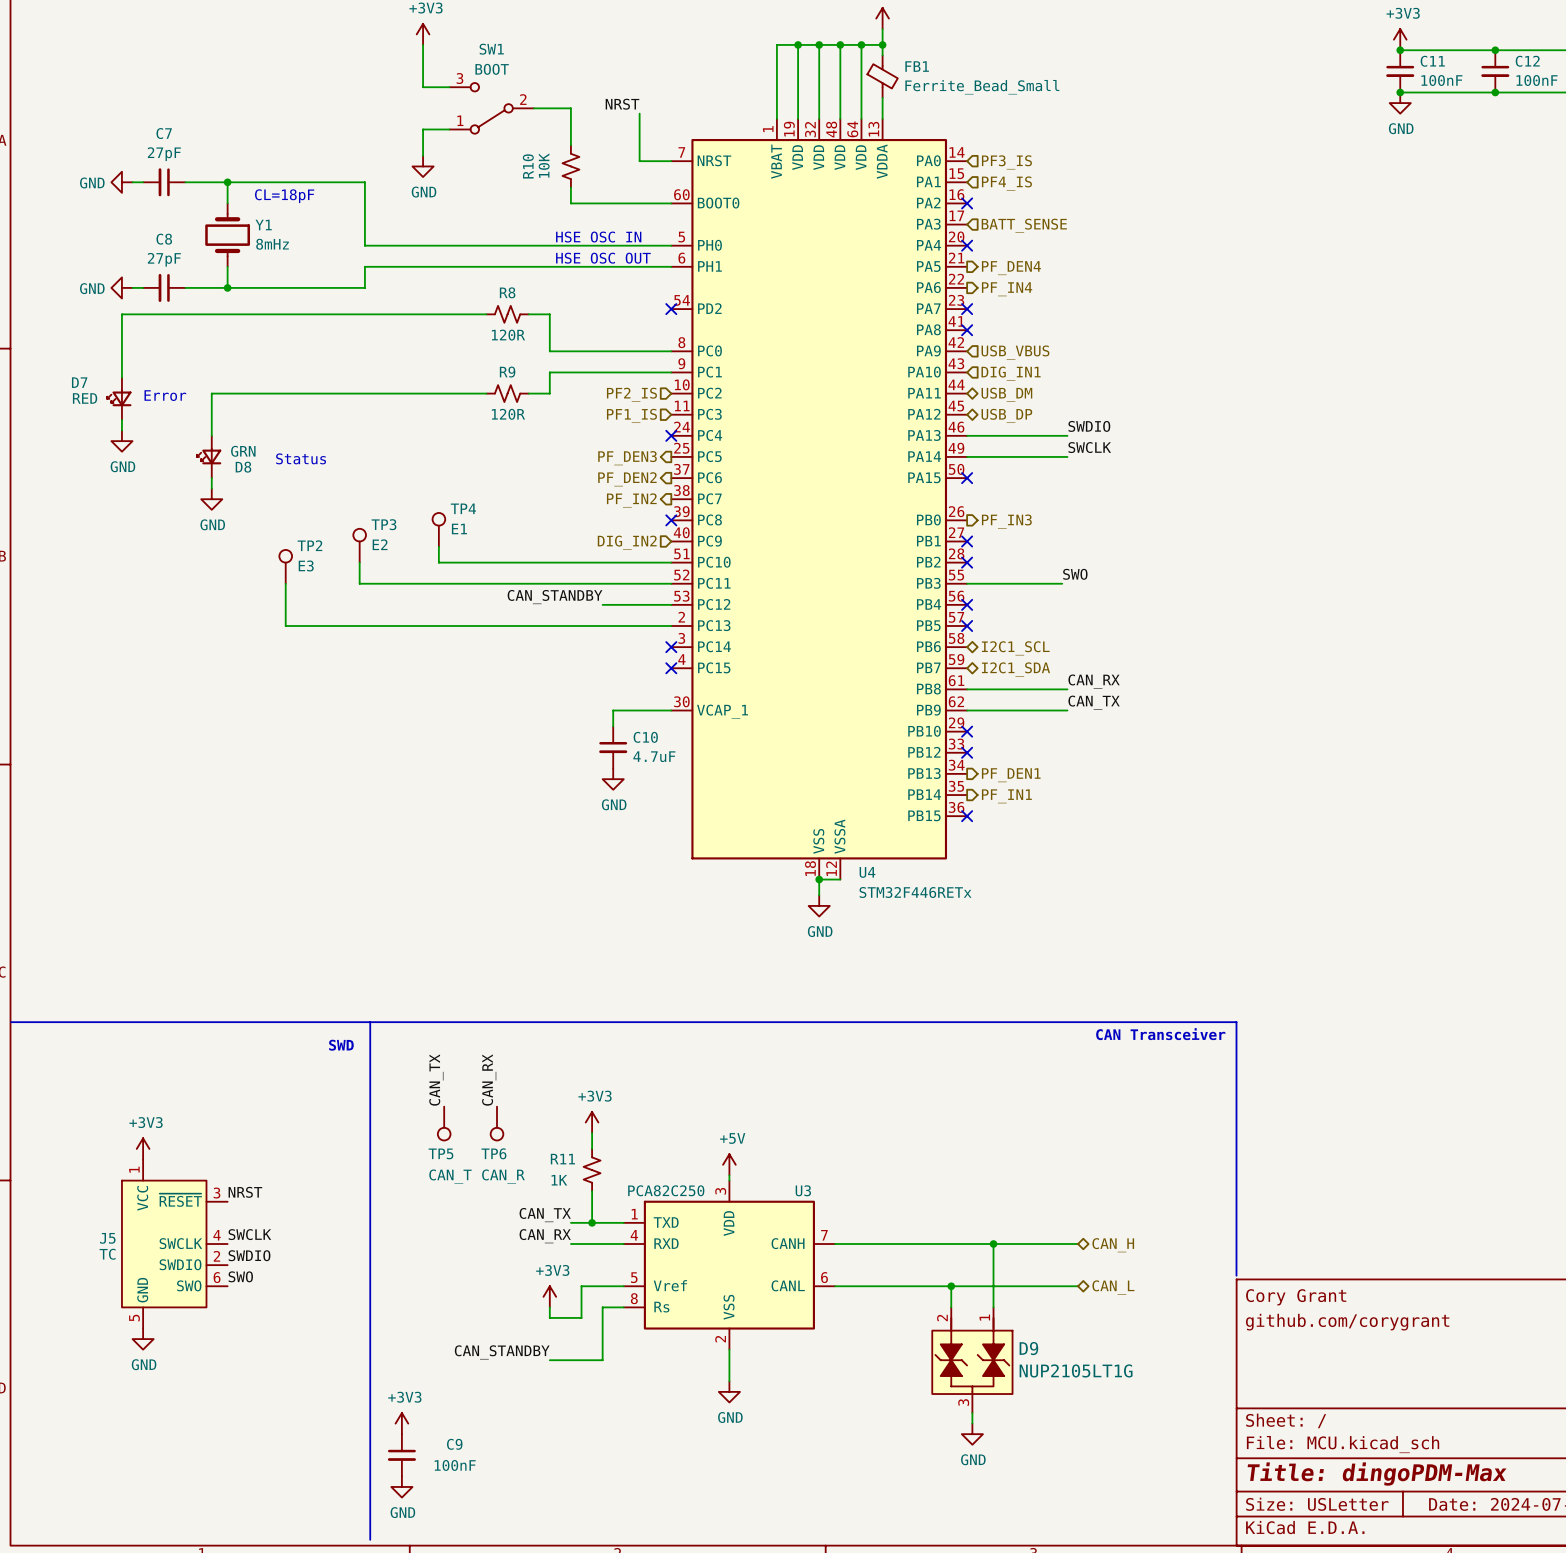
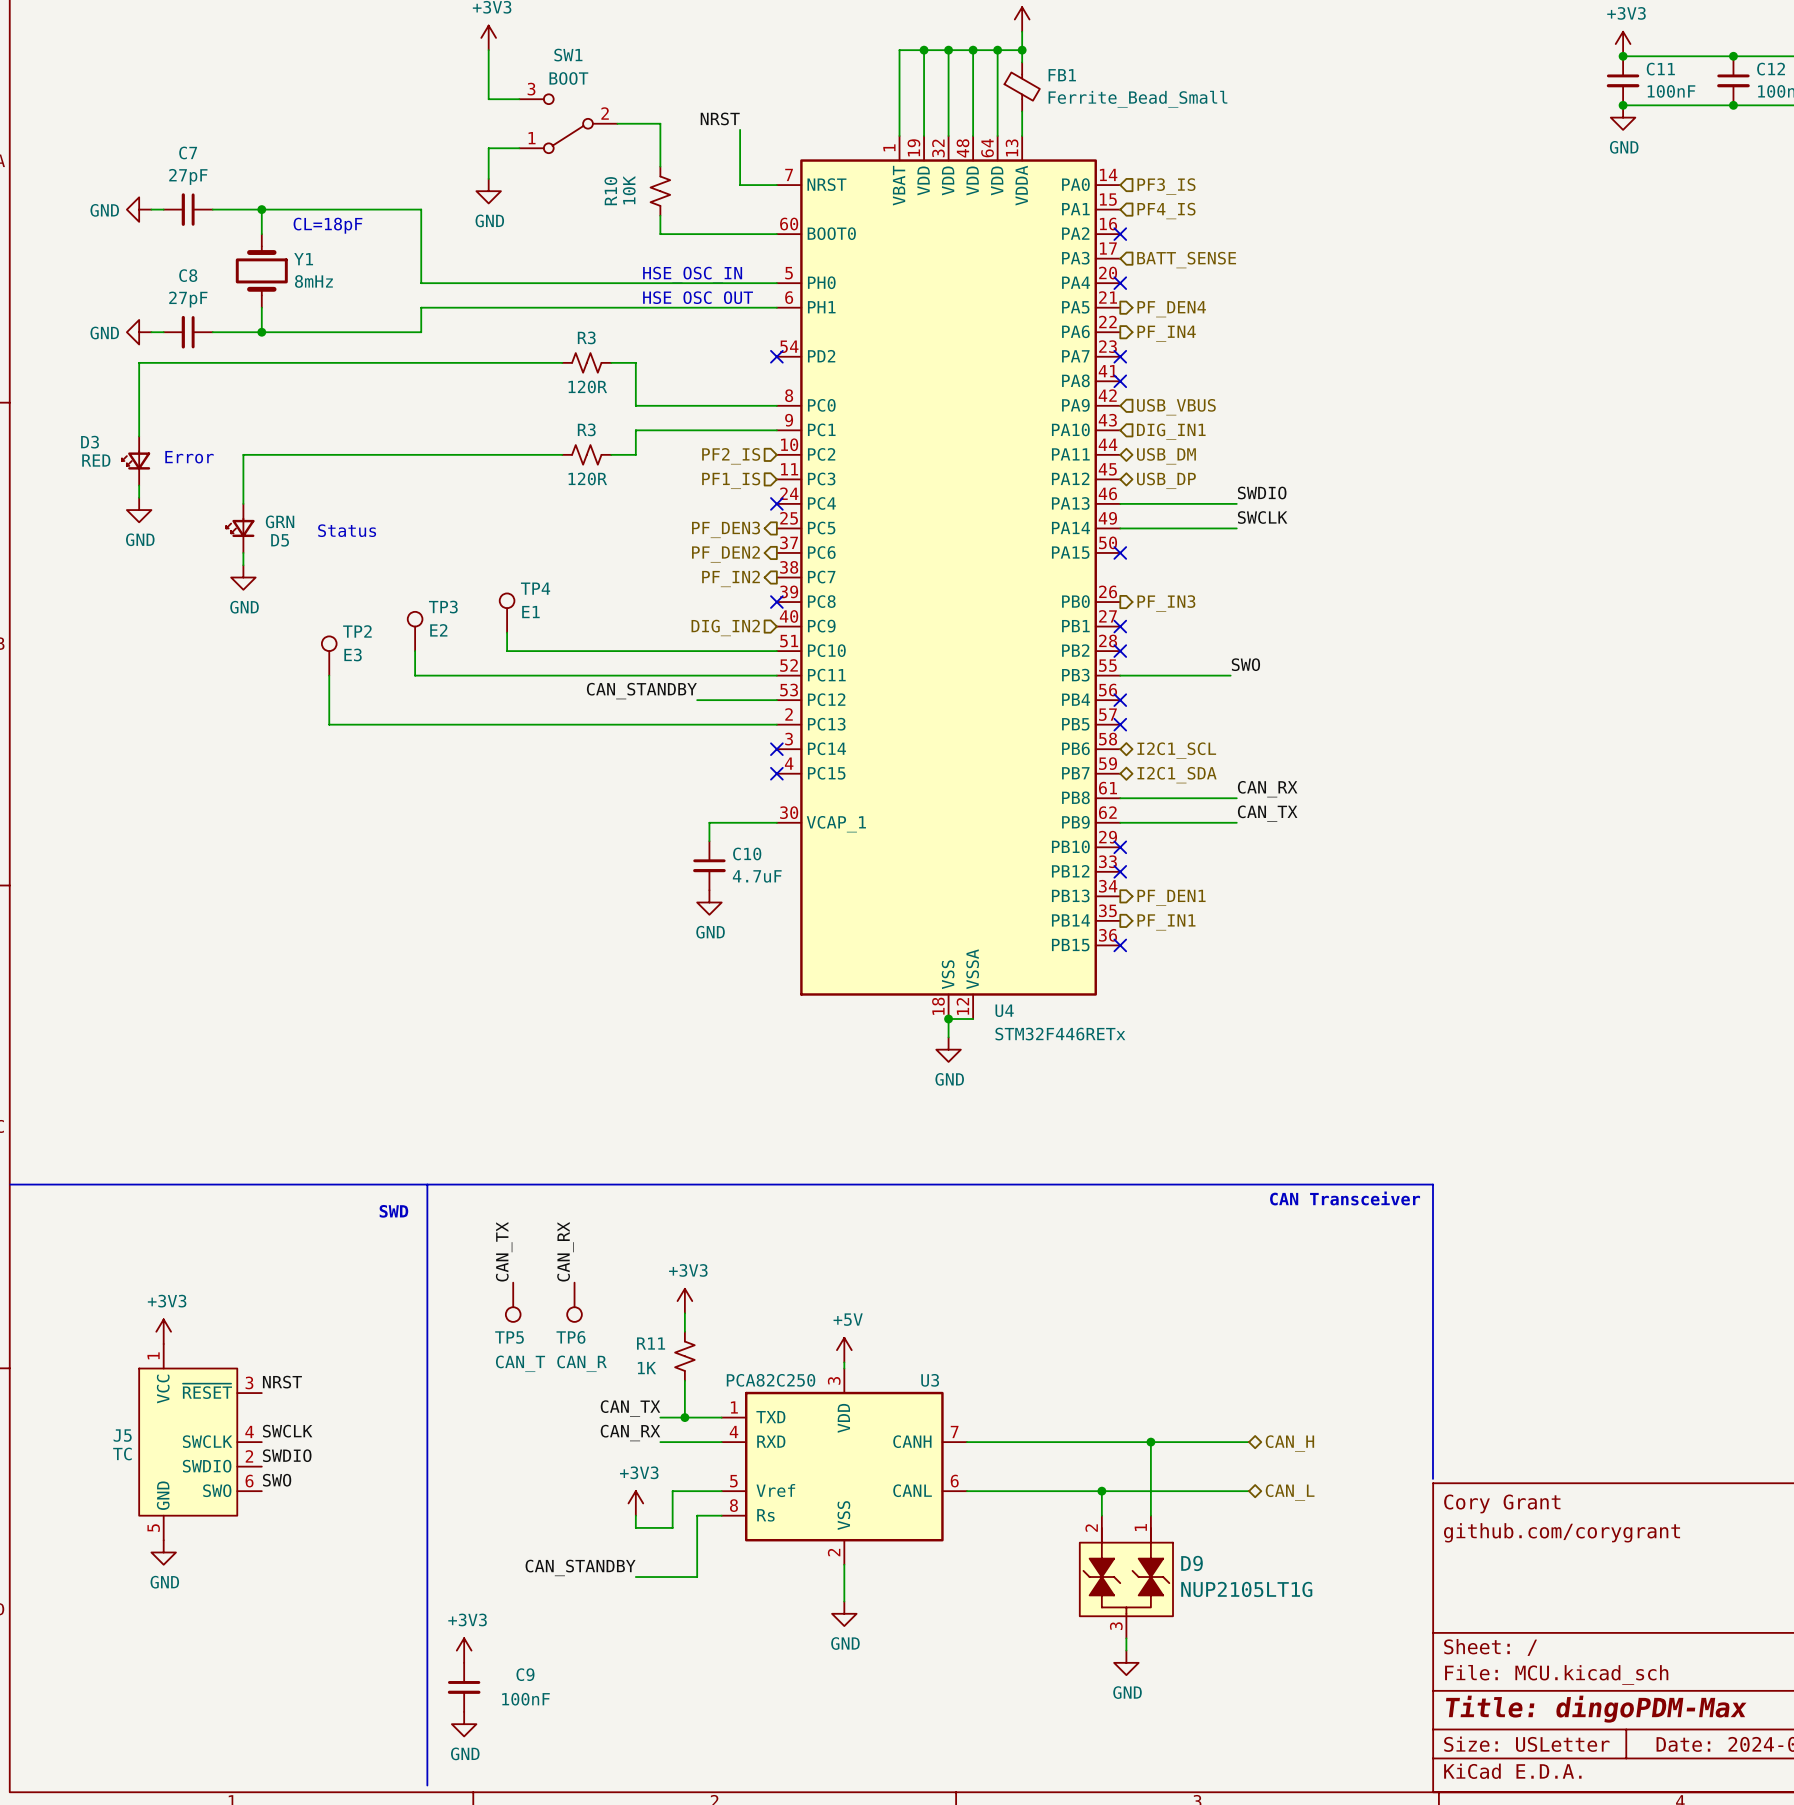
R8 name: R8 (507, 292) -> R3 (586, 337)
R9 name: R9 (507, 372) -> R3 (586, 429)
D7 name: D7 (79, 382) -> D3 (90, 442)
D8 name: D8 (243, 467) -> D5 (280, 540)

